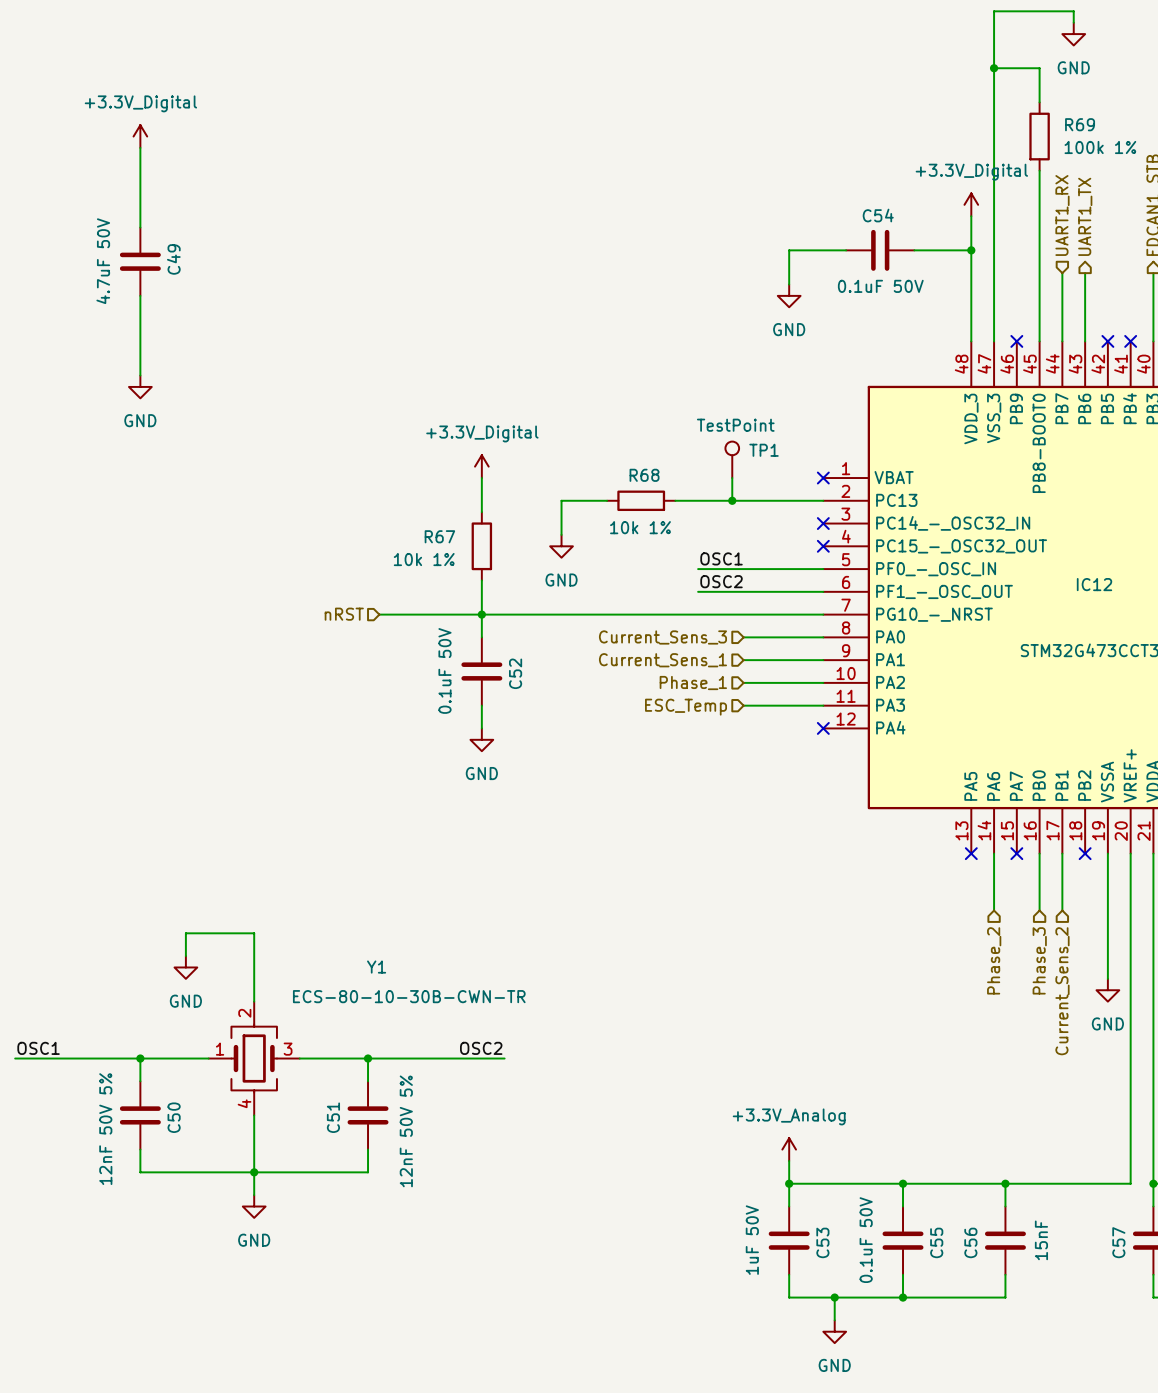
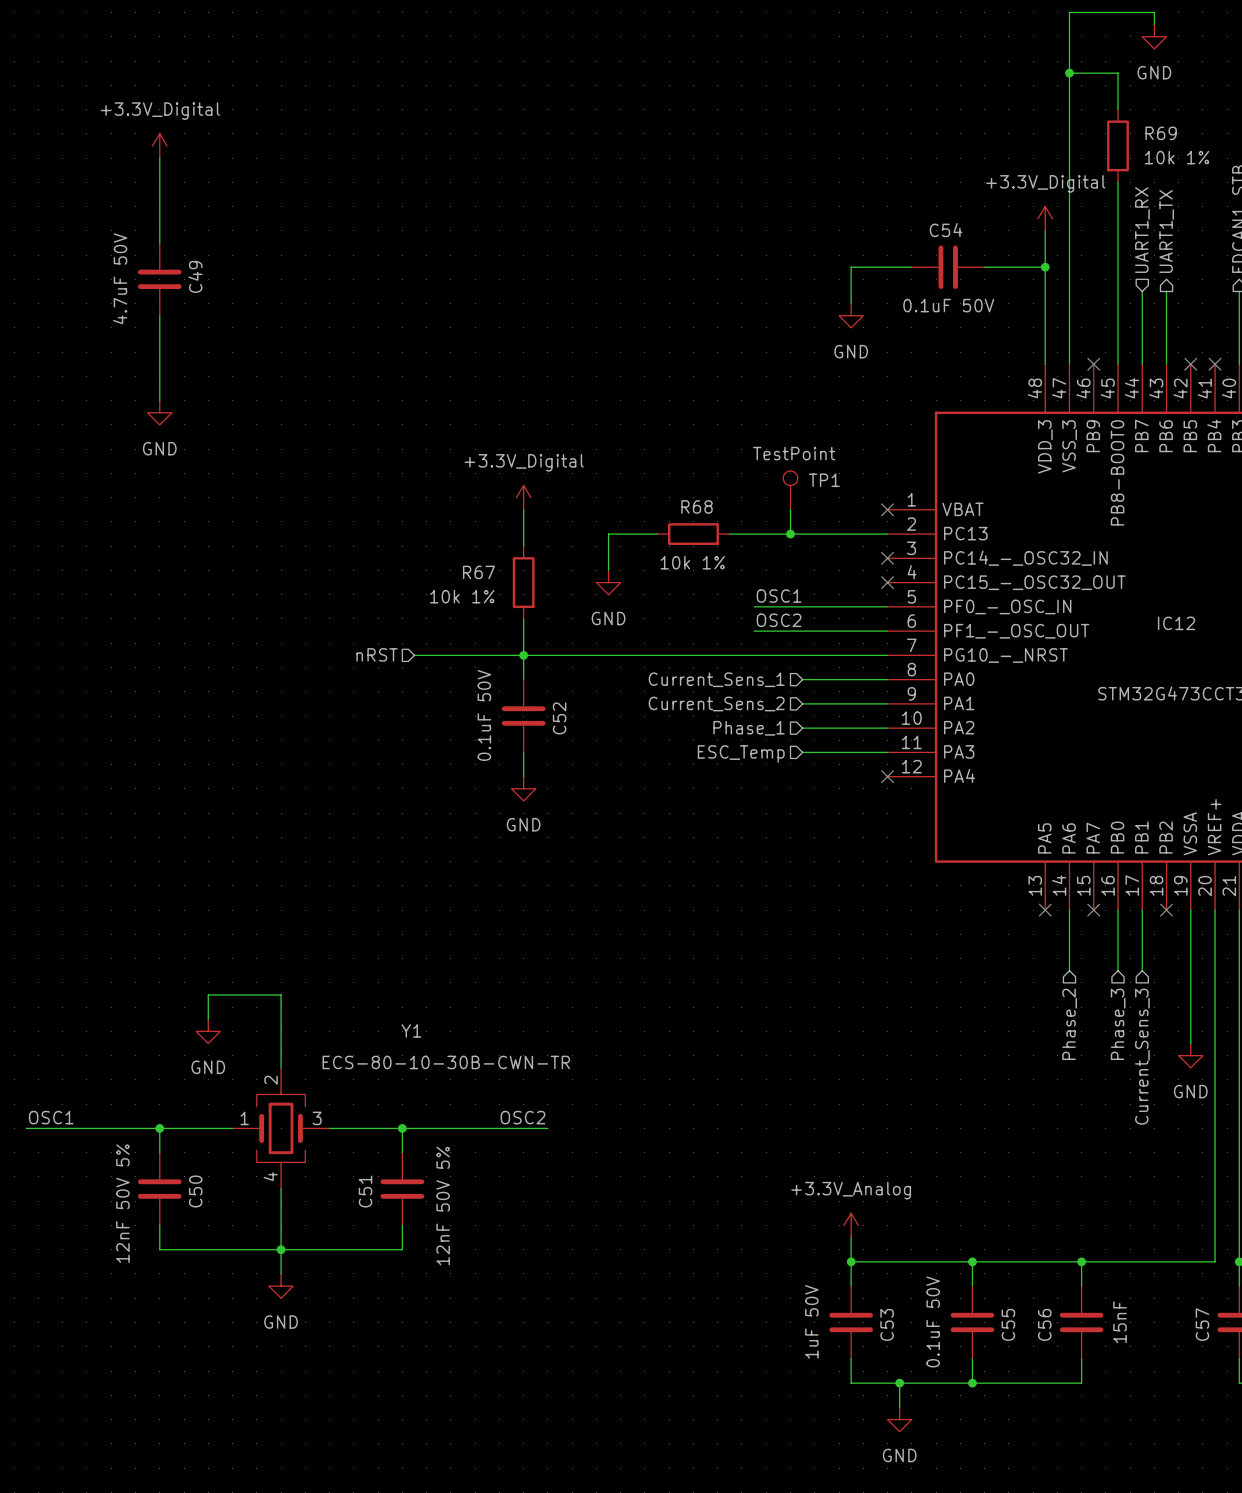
R69 value: 100k 1% (1100, 147) -> 10k 1% (1177, 157)
hierarchical label: Current_Sens_3 (662, 637) -> Current_Sens_1 (716, 679)
hierarchical label: Current_Sens_1 (662, 660) -> Current_Sens_2 (716, 704)
hierarchical label: Current_Sens_2 (1062, 991) -> Current_Sens_3 (1142, 1056)

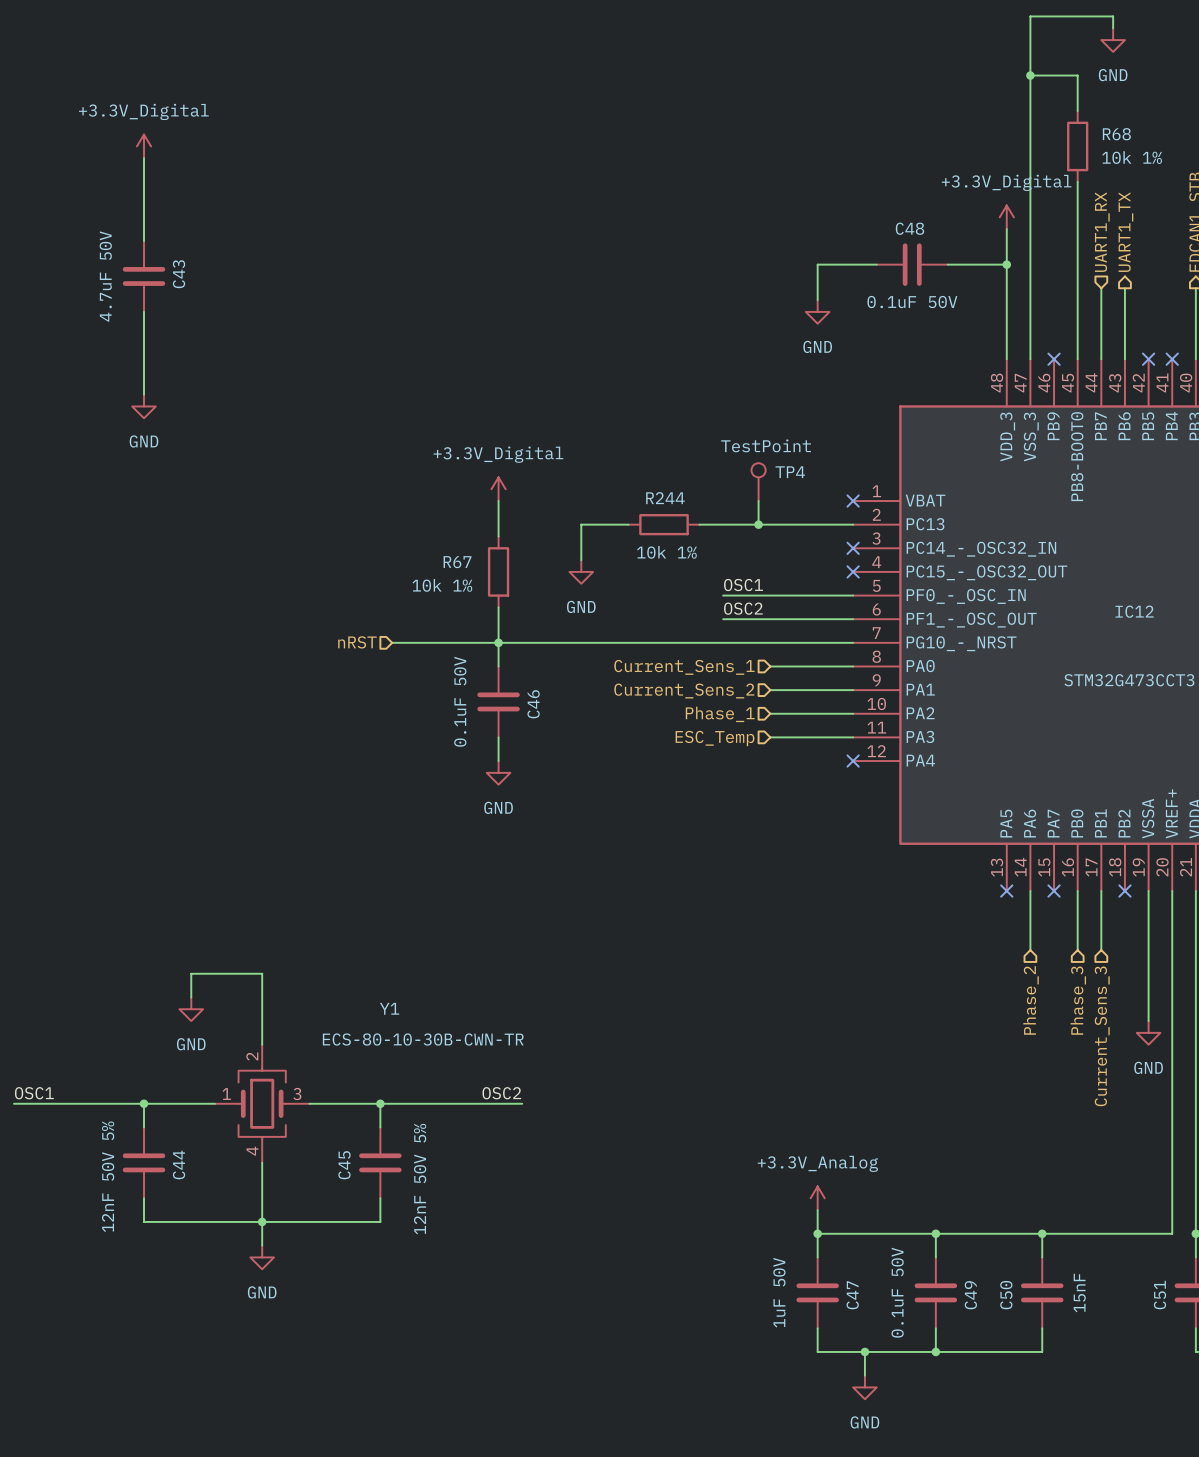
R69 name: R69 (1161, 133) -> R68 (1116, 134)
C54 name: C54 (946, 230) -> C48 (909, 228)
C49 name: C49 (195, 276) -> C43 (179, 274)
TP1 name: TP1 (824, 480) -> TP4 (790, 472)
R68 name: R68 (697, 506) -> R244 (665, 498)
C52 name: C52 (559, 718) -> C46 (533, 704)
C50 name: C50 (195, 1191) -> C44 (179, 1164)
C51 name: C51 (365, 1191) -> C45 (344, 1165)
C53 name: C53 (887, 1324) -> C47 (852, 1295)
C55 name: C55 (1008, 1324) -> C49 (970, 1295)
C56 name: C56 (1044, 1324) -> C50 (1006, 1295)
C57 name: C57 (1202, 1324) -> C51 (1159, 1295)

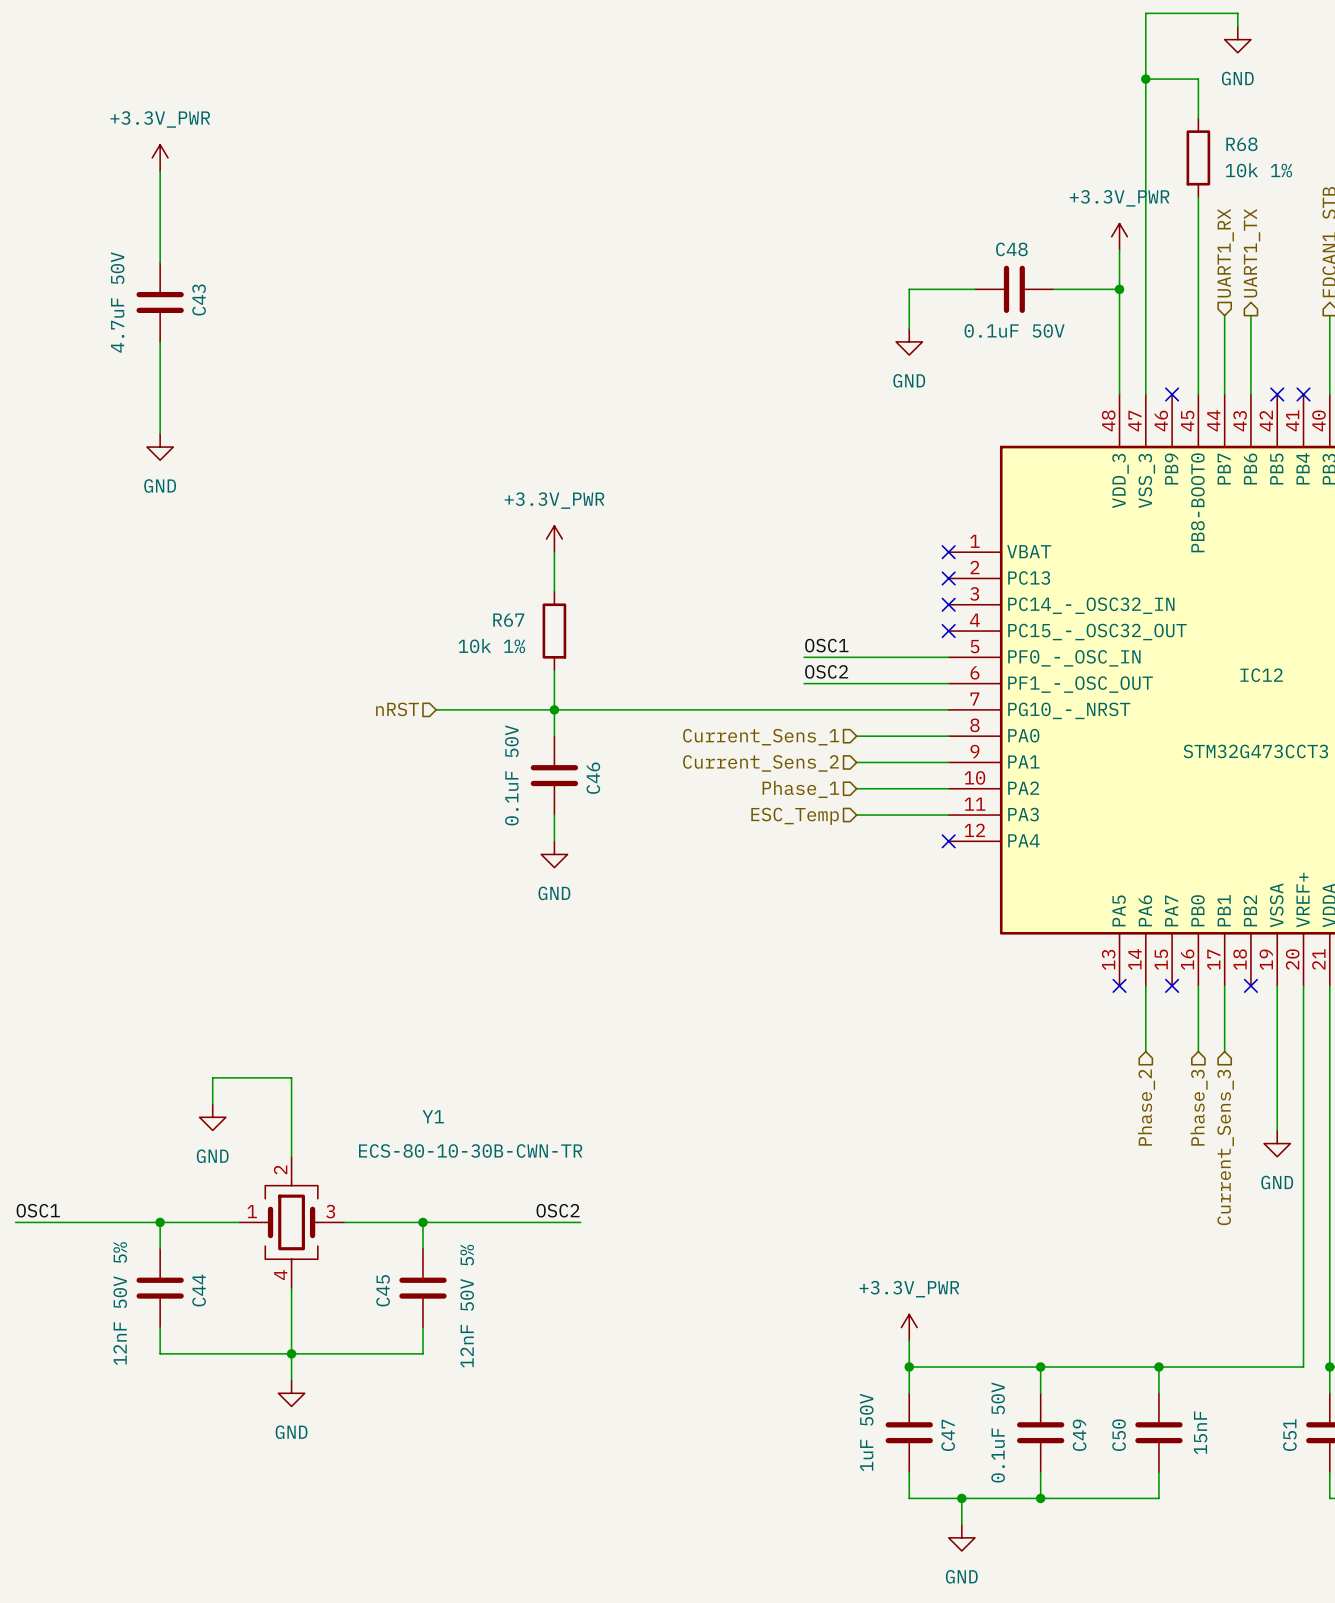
power symbol: +3.3V_Digital (144, 146) -> +3.3V_PWR (160, 157)
power symbol: +3.3V_Digital (1006, 217) -> +3.3V_PWR (1119, 236)
TP4: TestPoint (758, 482) -> none
power symbol: +3.3V_Digital (498, 489) -> +3.3V_PWR (554, 539)
wire: (758, 501) (758, 524) -> none
wire: (628, 524) (581, 524) (581, 560) -> none
R244: 10k 1% (664, 524) -> none
wire: (699, 524) (853, 524) -> none
junction: (758, 524) -> none
no-connect mark: none -> (948, 578)
power symbol: GND (581, 571) -> none
power symbol: +3.3V_Analog (817, 1198) -> +3.3V_PWR (909, 1327)

